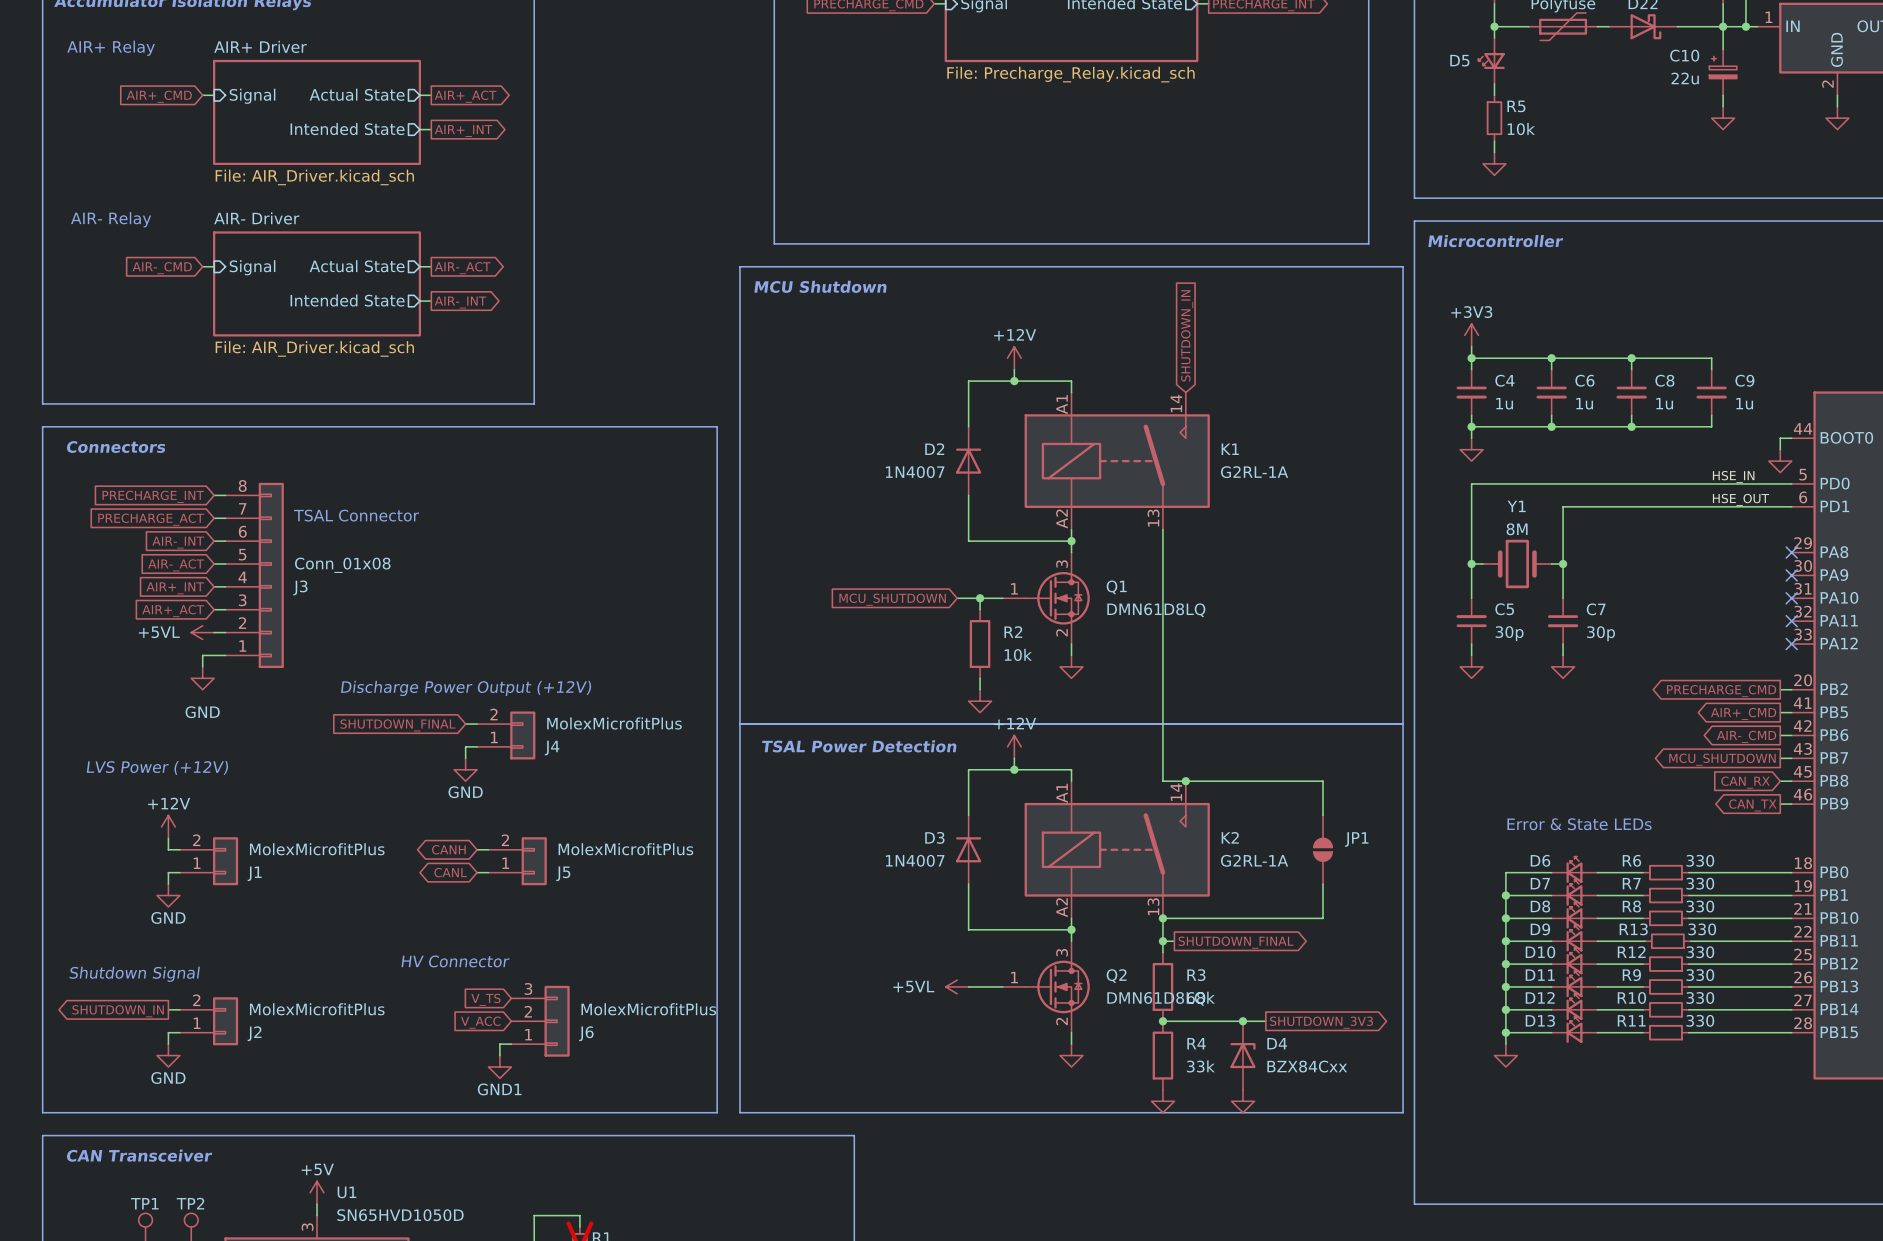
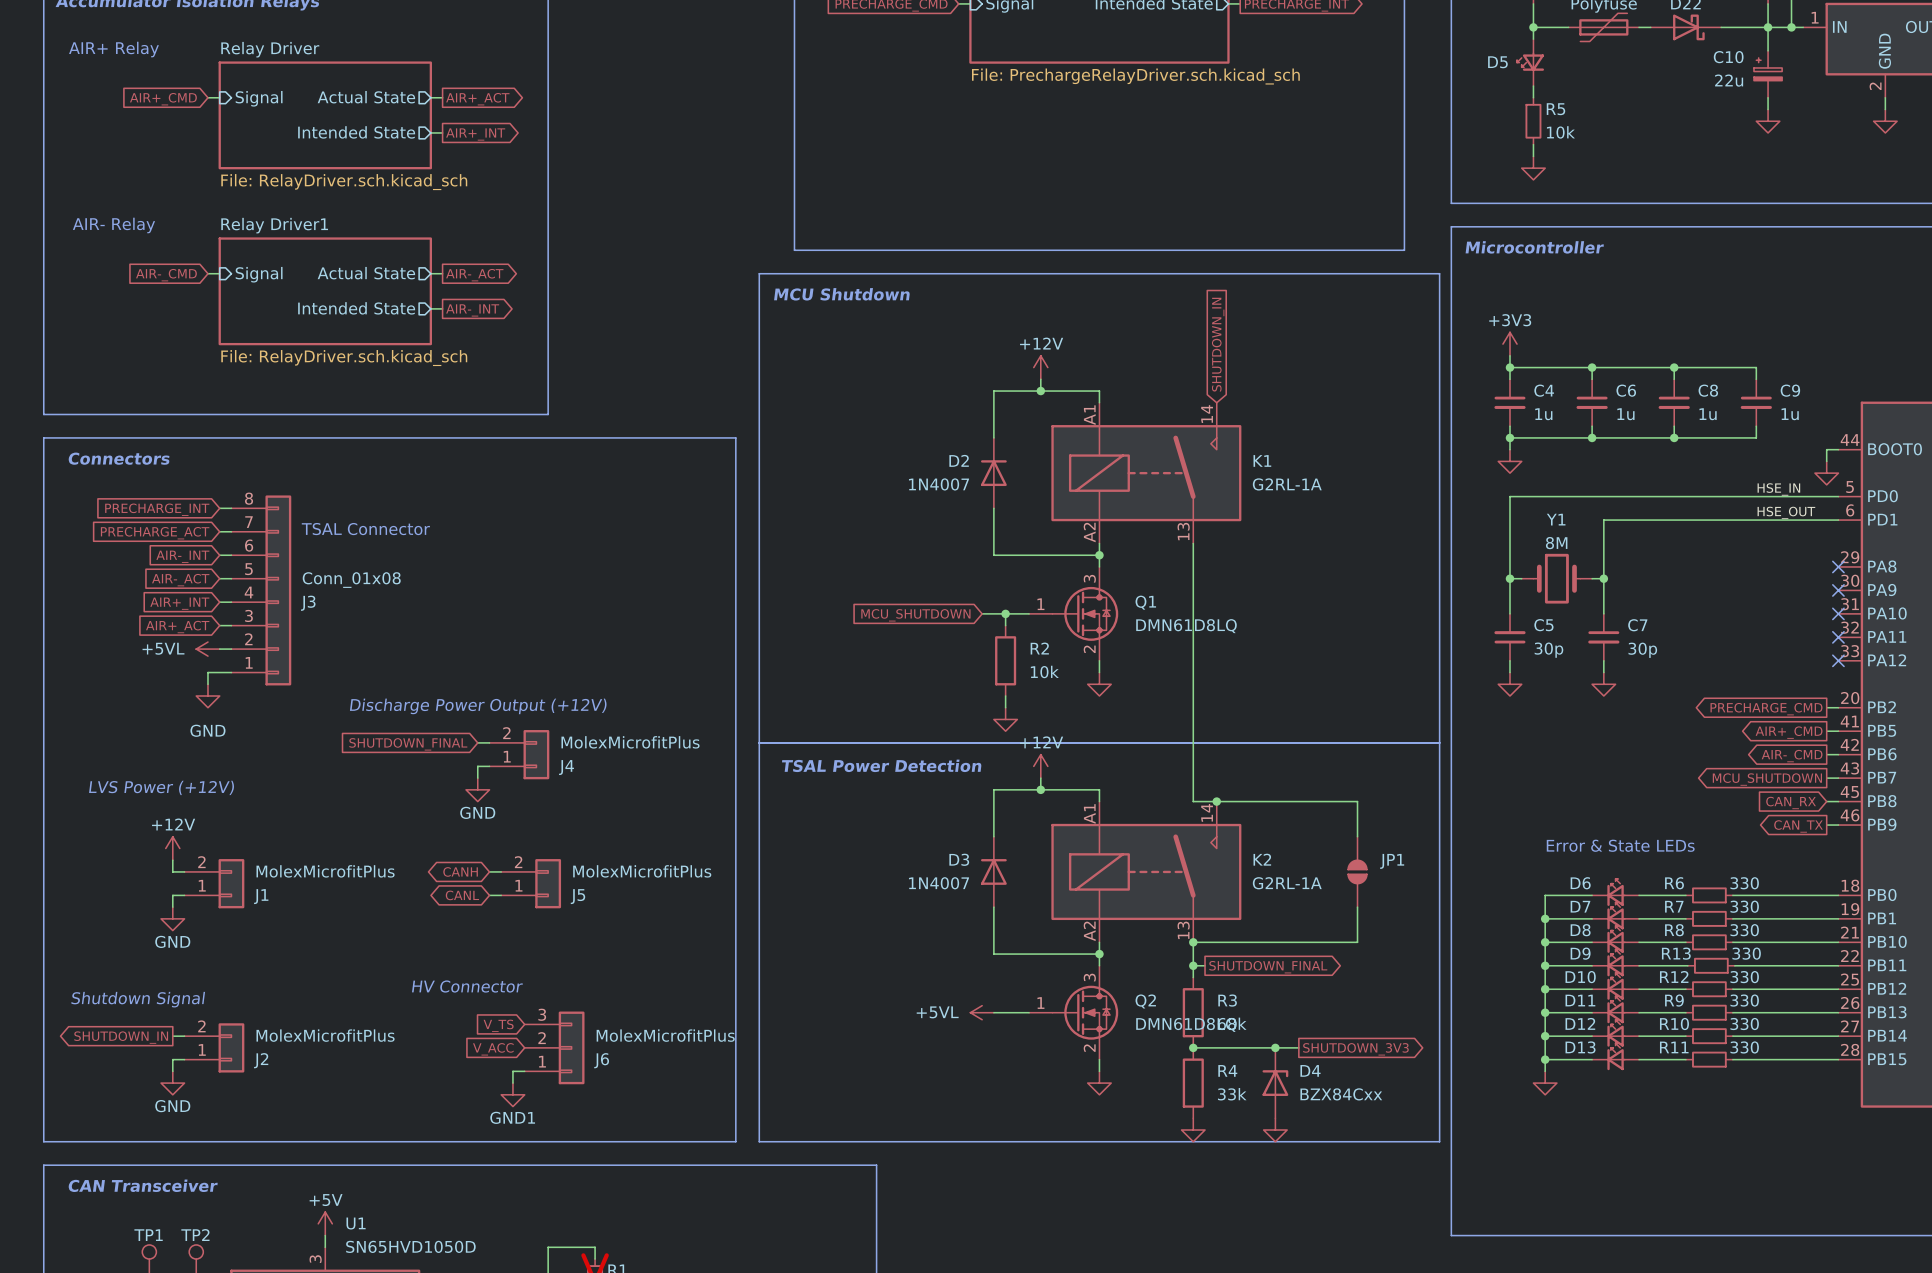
sheet AIR+ Driver name: AIR+ Driver (260, 46) -> Relay Driver (270, 49)
sheet value: File: Precharge_Relay.kicad_sch (1070, 74) -> File: PrechargeRelayDriver.sch.kicad_sch (1135, 76)
sheet AIR+ Driver value: File: AIR_Driver.kicad_sch (314, 177) -> File: RelayDriver.sch.kicad_sch (344, 182)
sheet AIR- Driver name: AIR- Driver (256, 218) -> Relay Driver1 (274, 225)
sheet AIR- Driver value: File: AIR_Driver.kicad_sch (314, 348) -> File: RelayDriver.sch.kicad_sch (344, 358)

